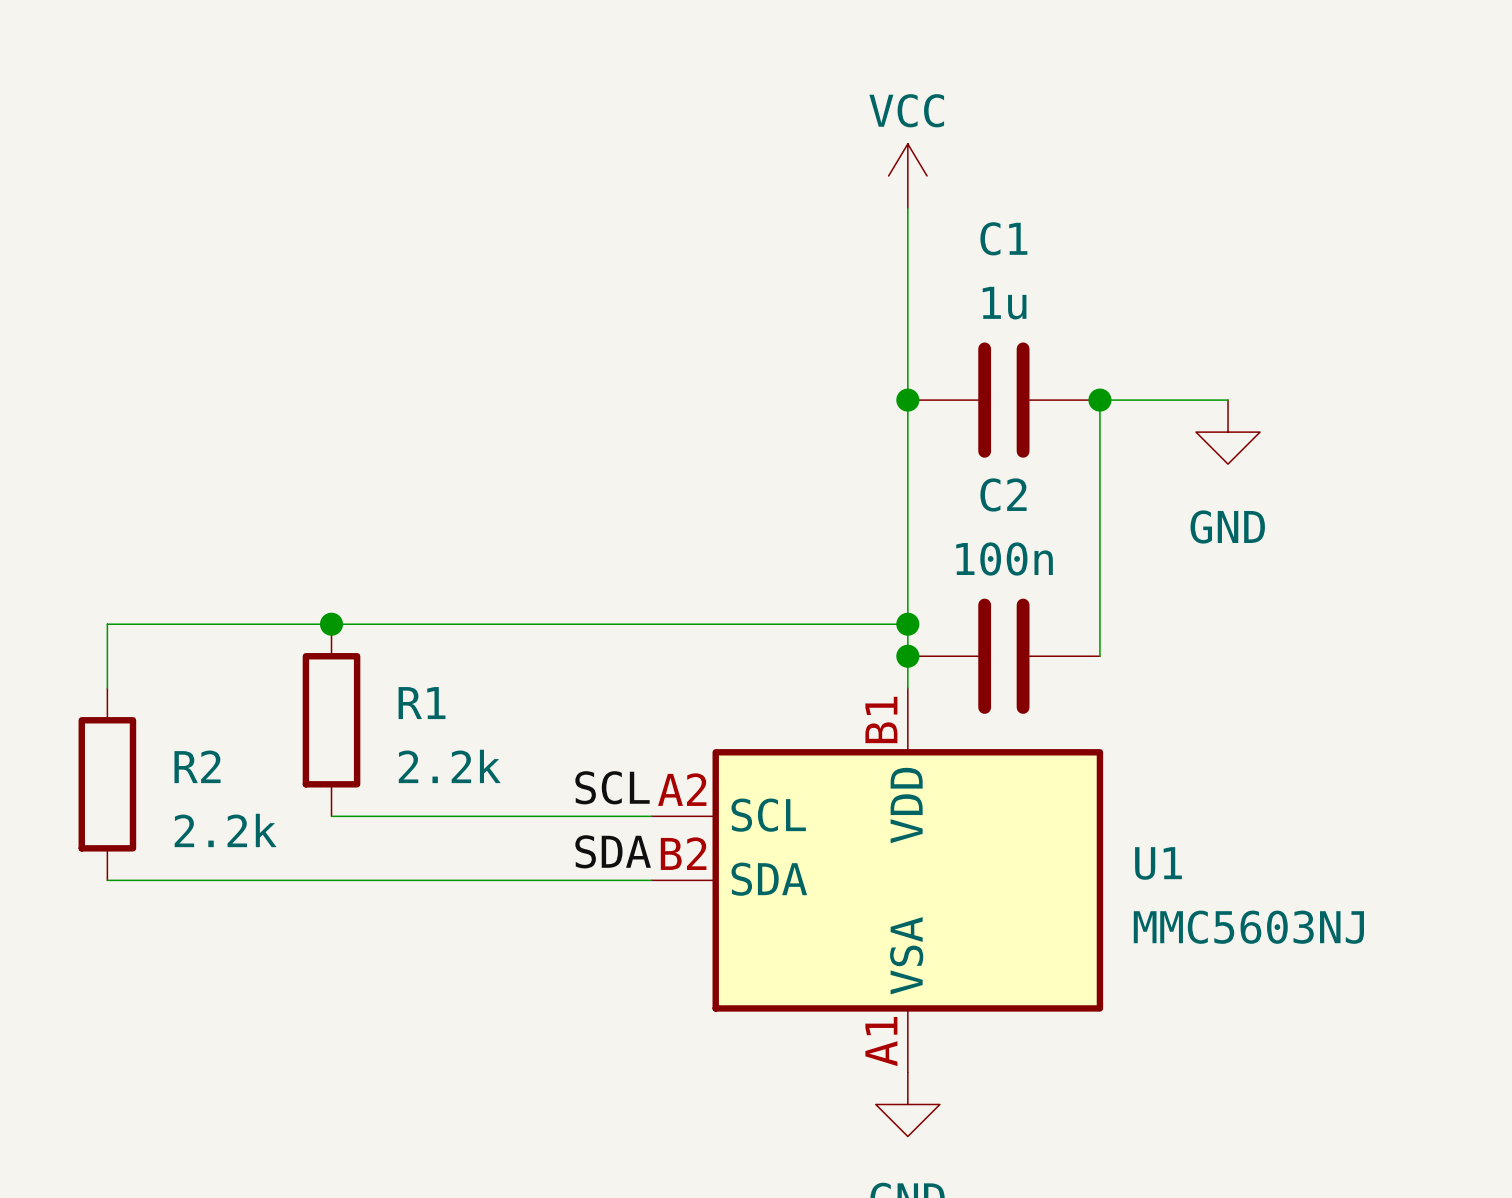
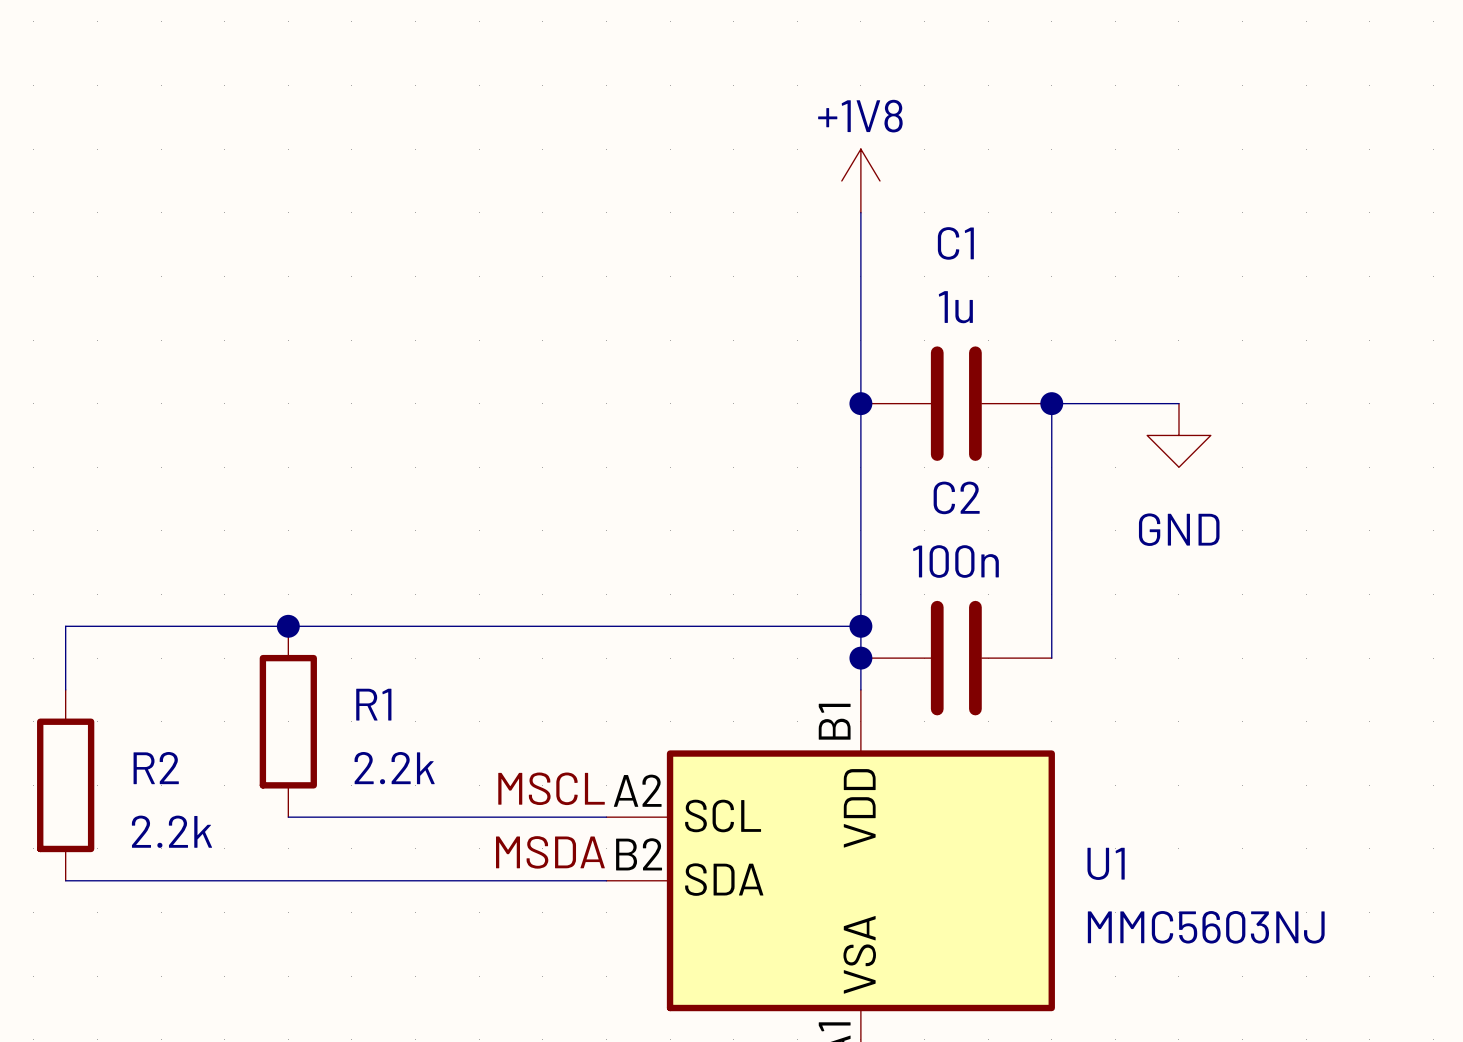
power symbol: VCC (907, 175) -> +1V8 (860, 180)
label: SCL (612, 787) -> MSCL (551, 788)
label: SDA (613, 851) -> MSDA (550, 852)

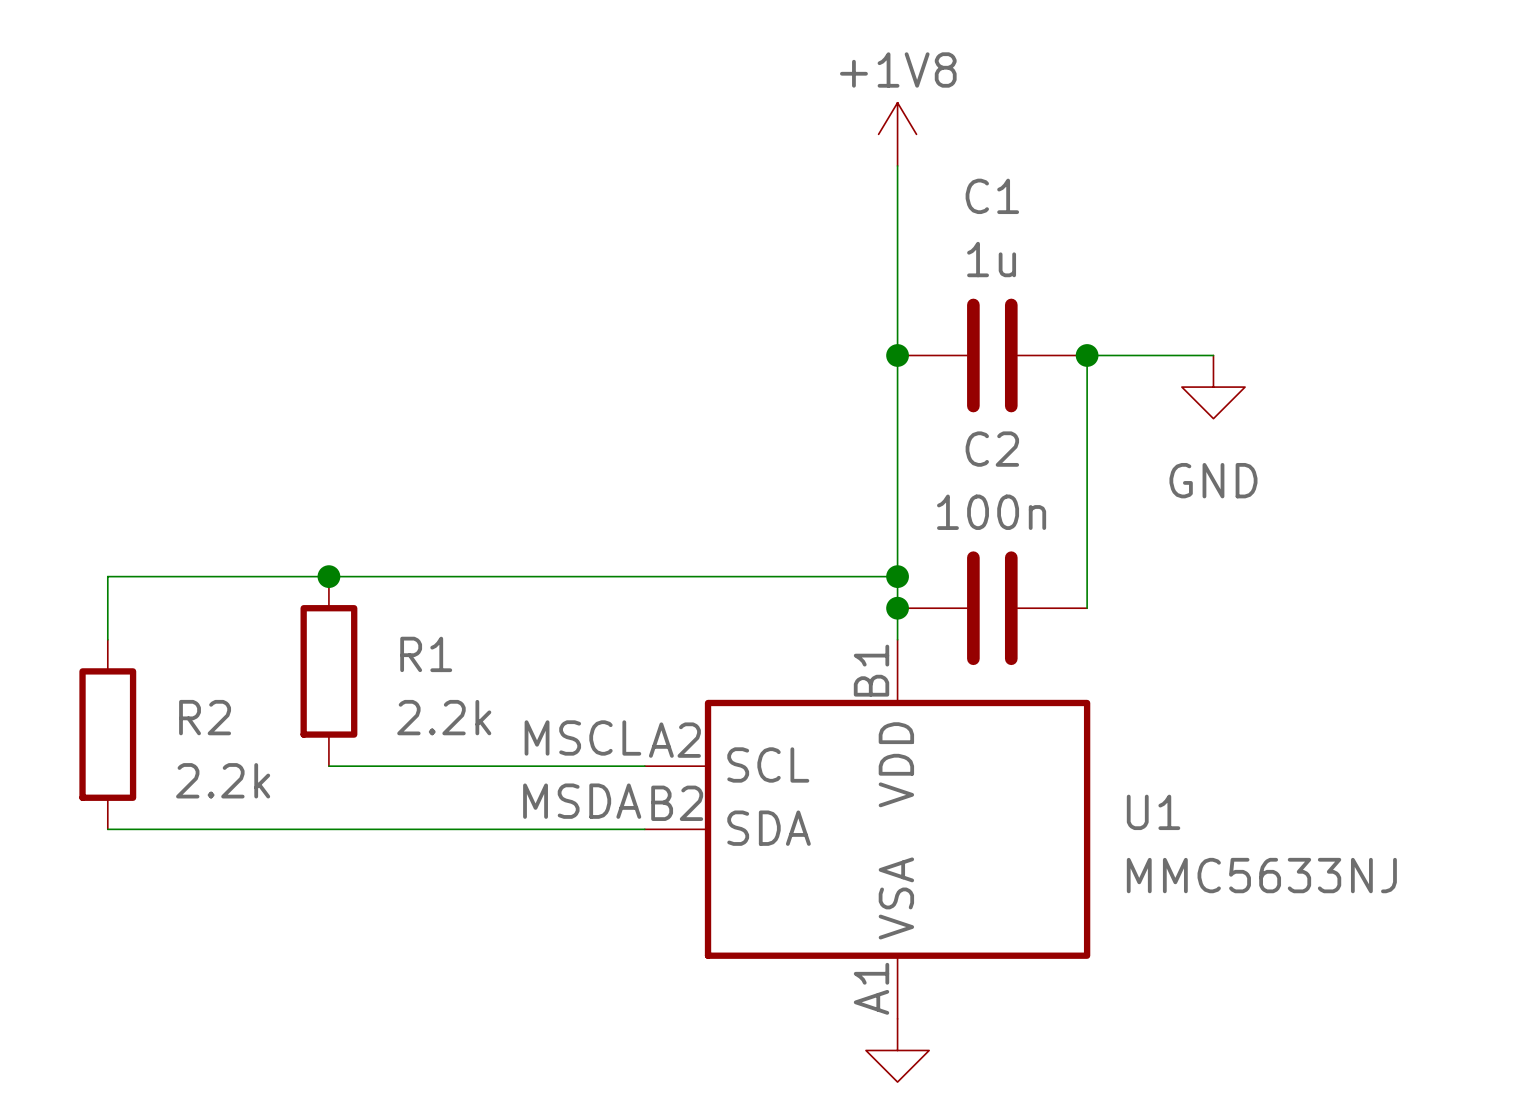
U1 value: MMC5603NJ (1206, 927) -> MMC5633NJ (1261, 875)

